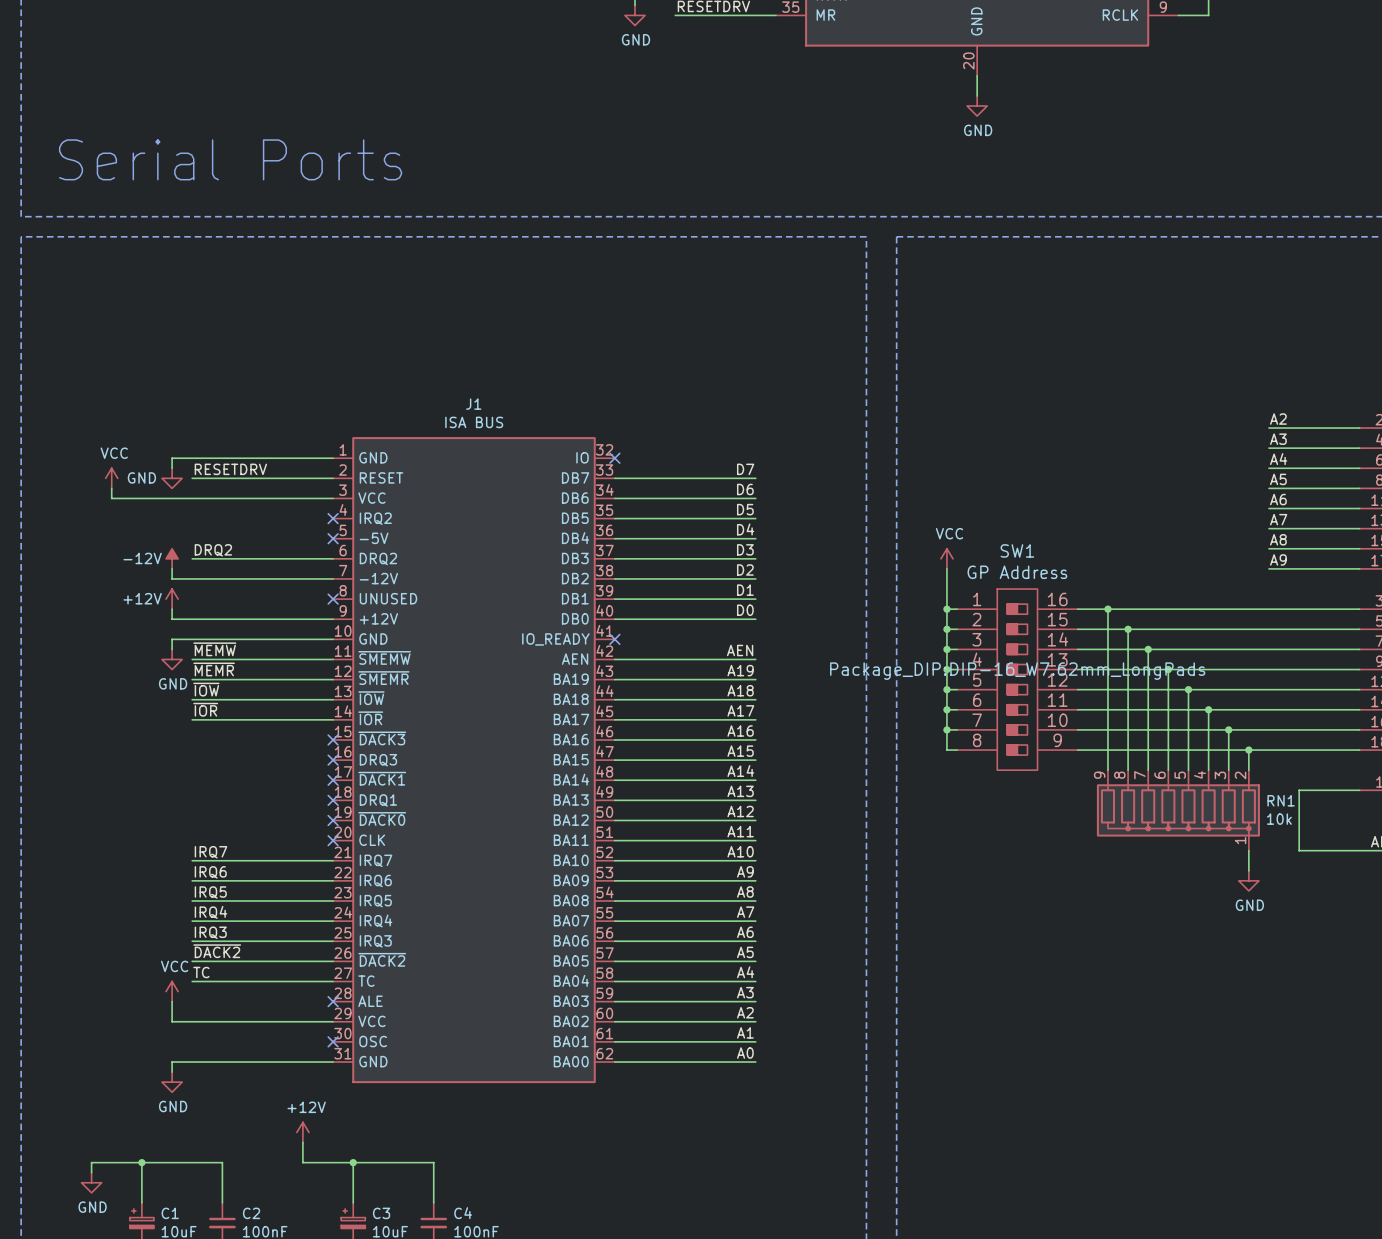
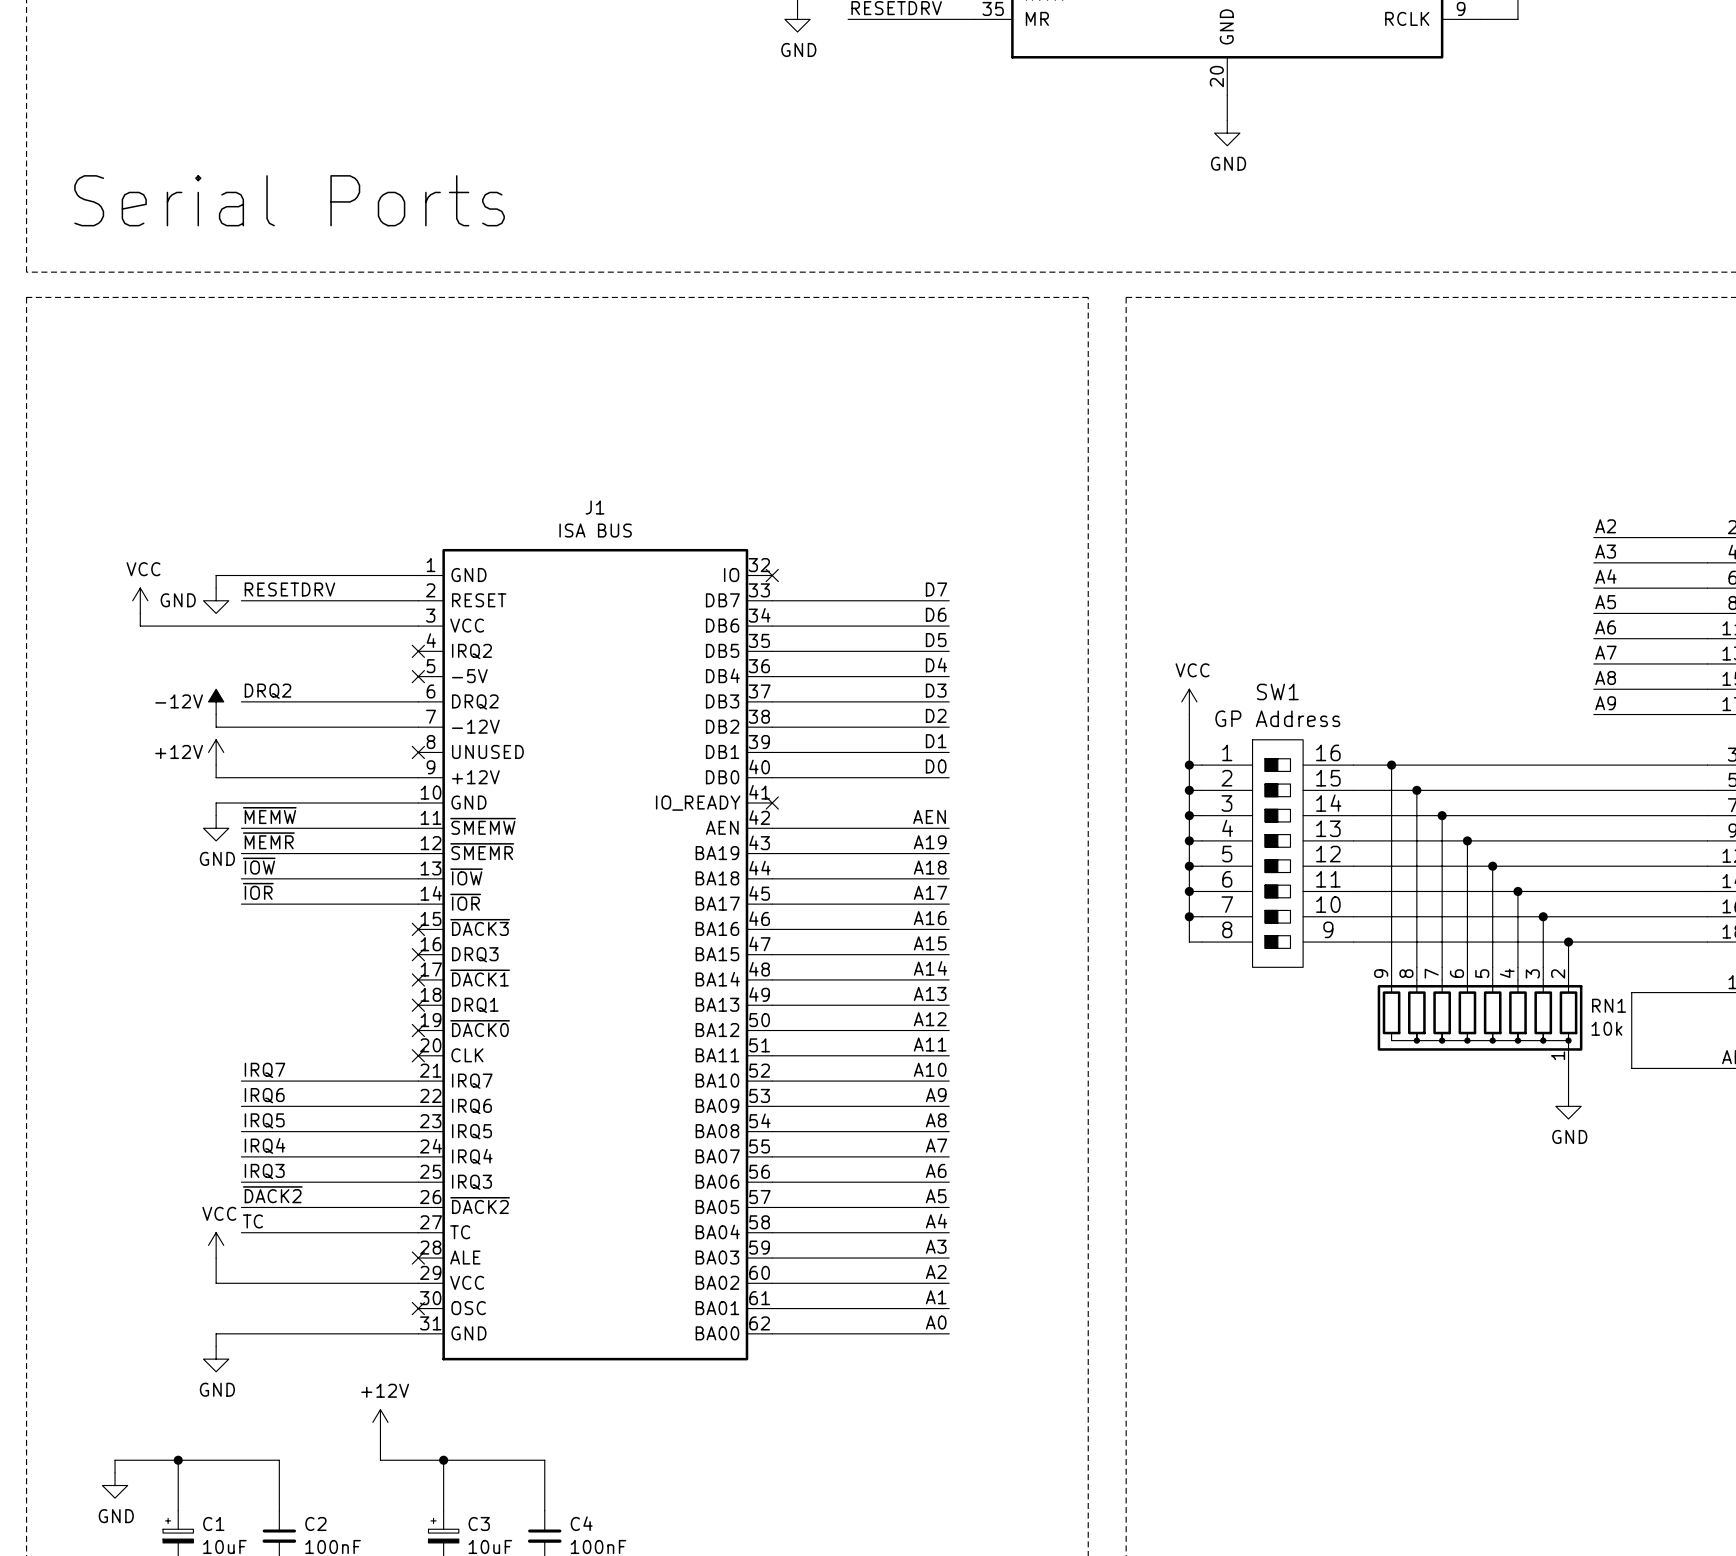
SW1 text: Package_DIP:DIP-16_W7.62mm_LongPads (1017, 671) -> none

